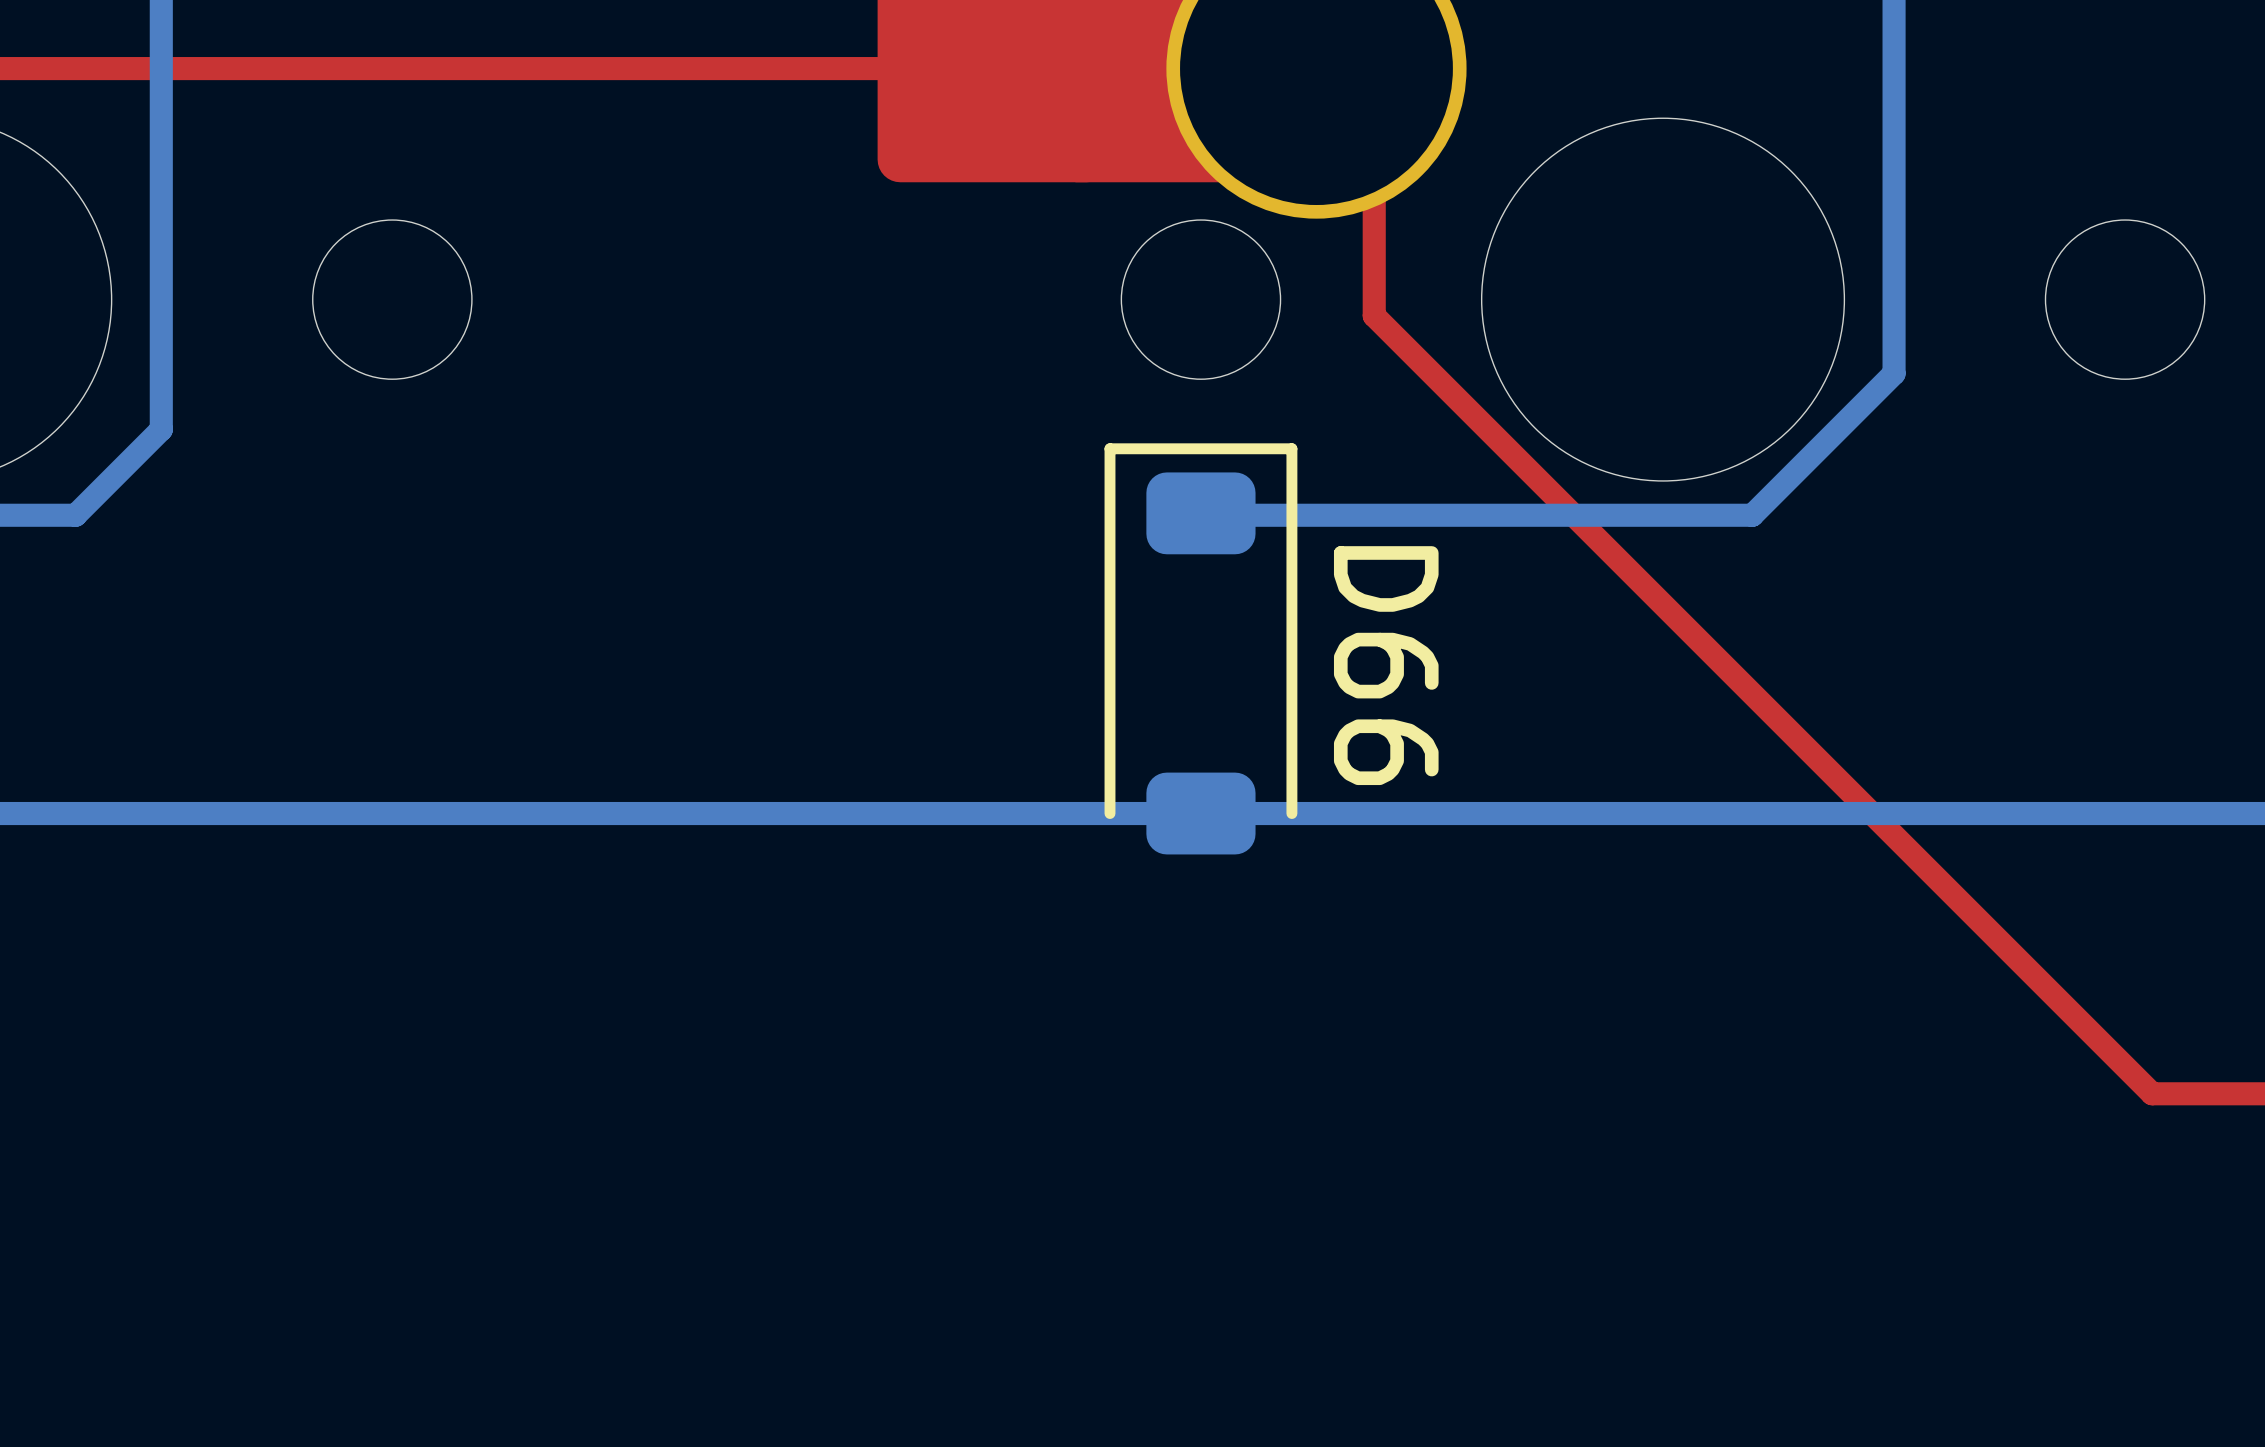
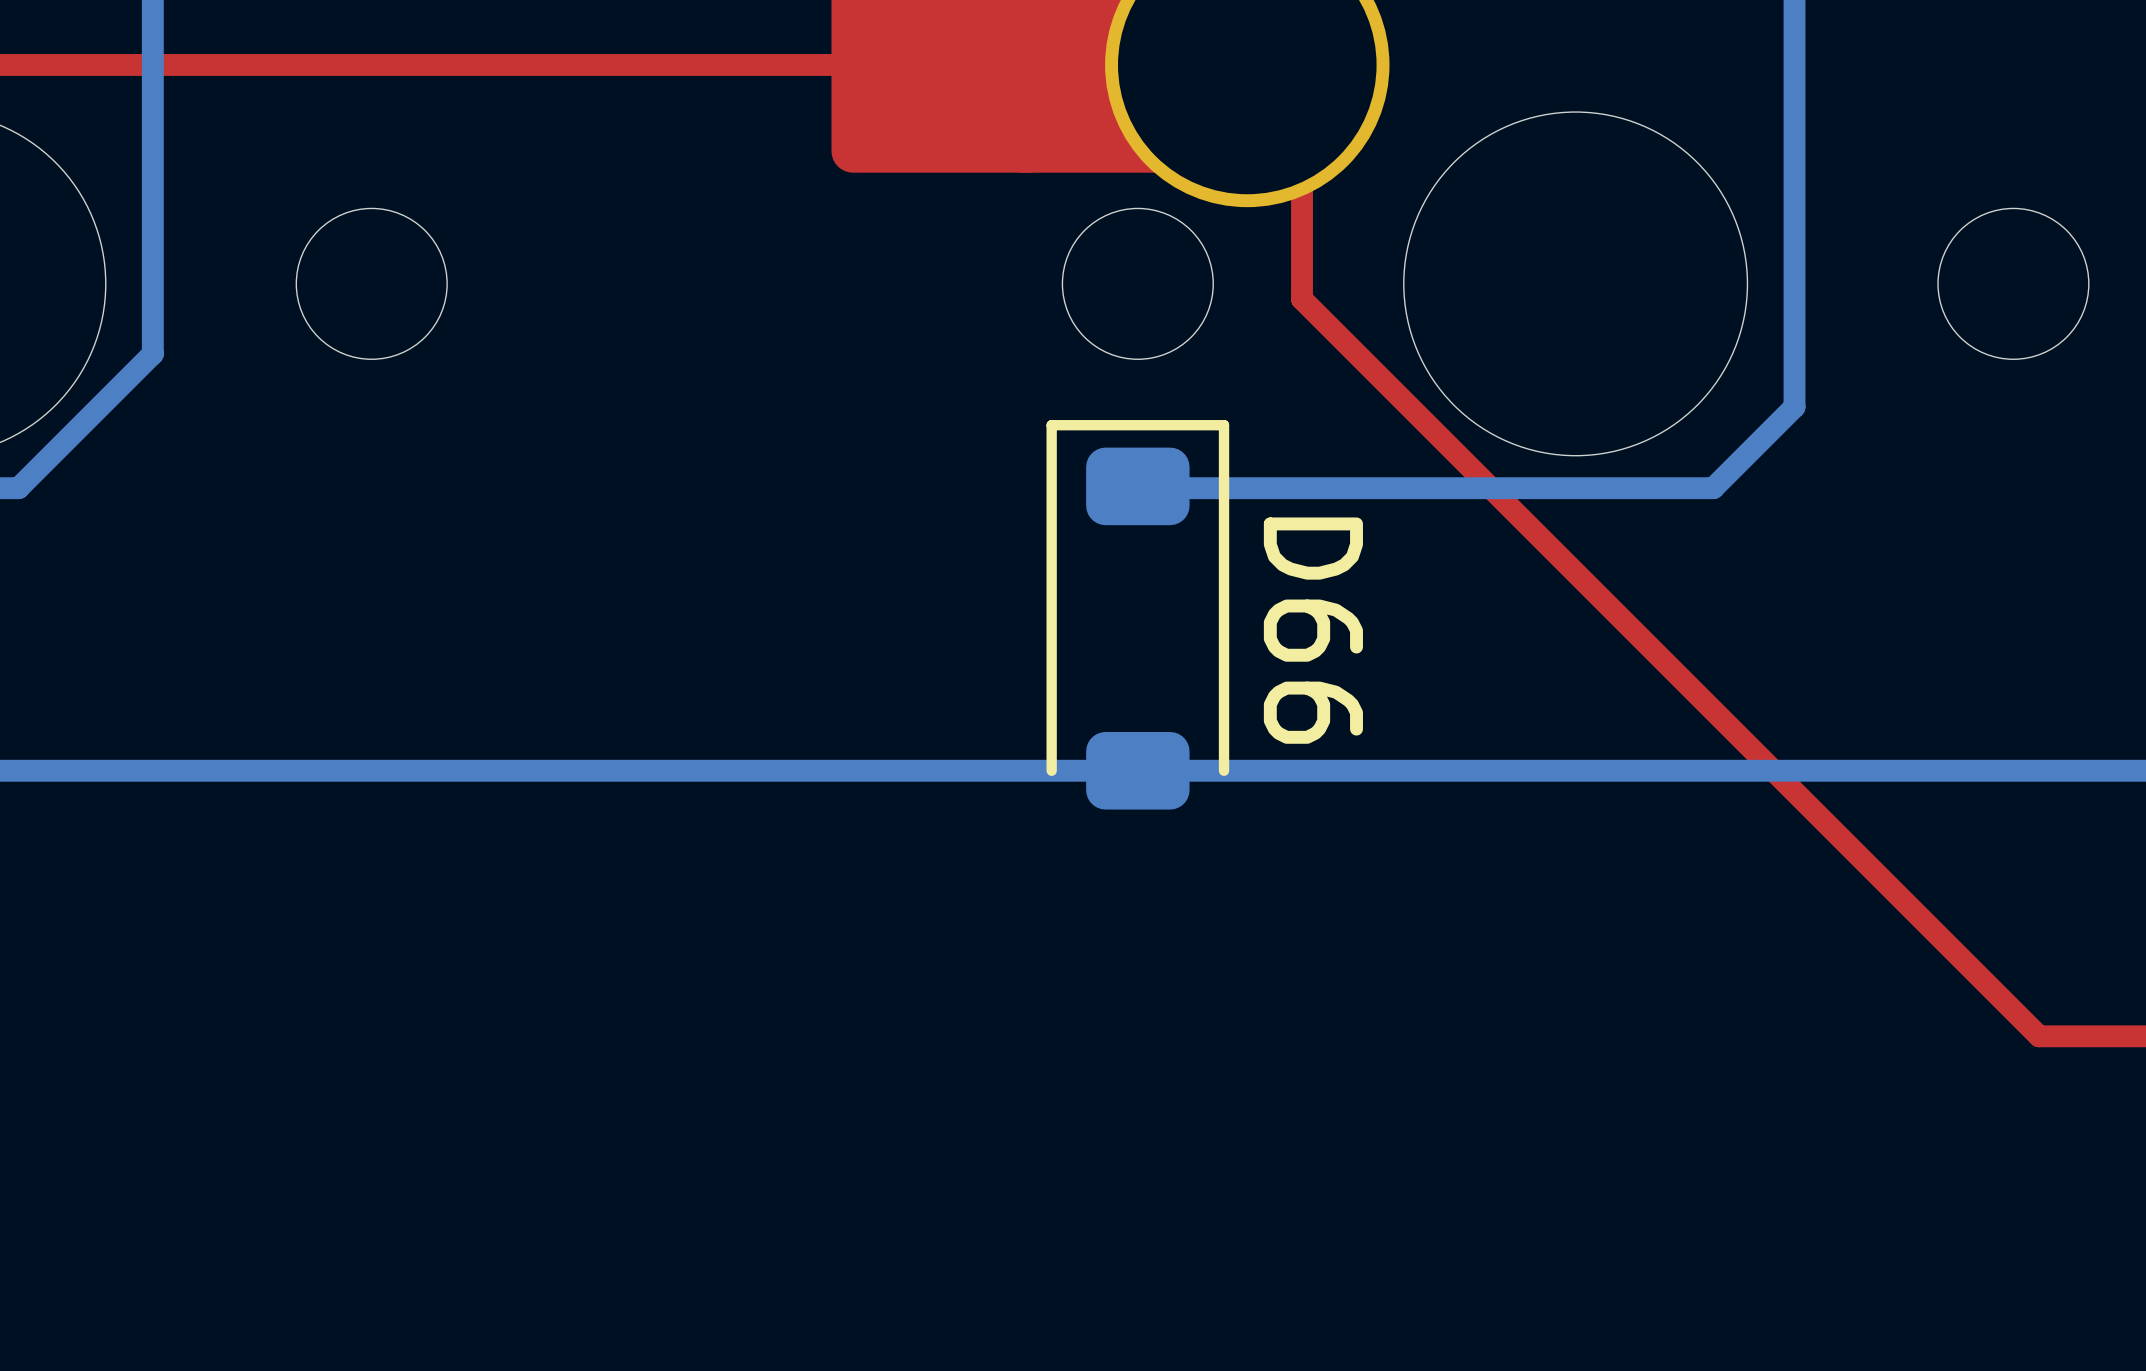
bottom track: (161, 373) (161, 429) (75, 515) (19, 515) -> (152, 353) (18, 488)
bottom track: (1894, 373) (1752, 515) -> (1794, 353) (1794, 406) (1713, 488) (1660, 488)

